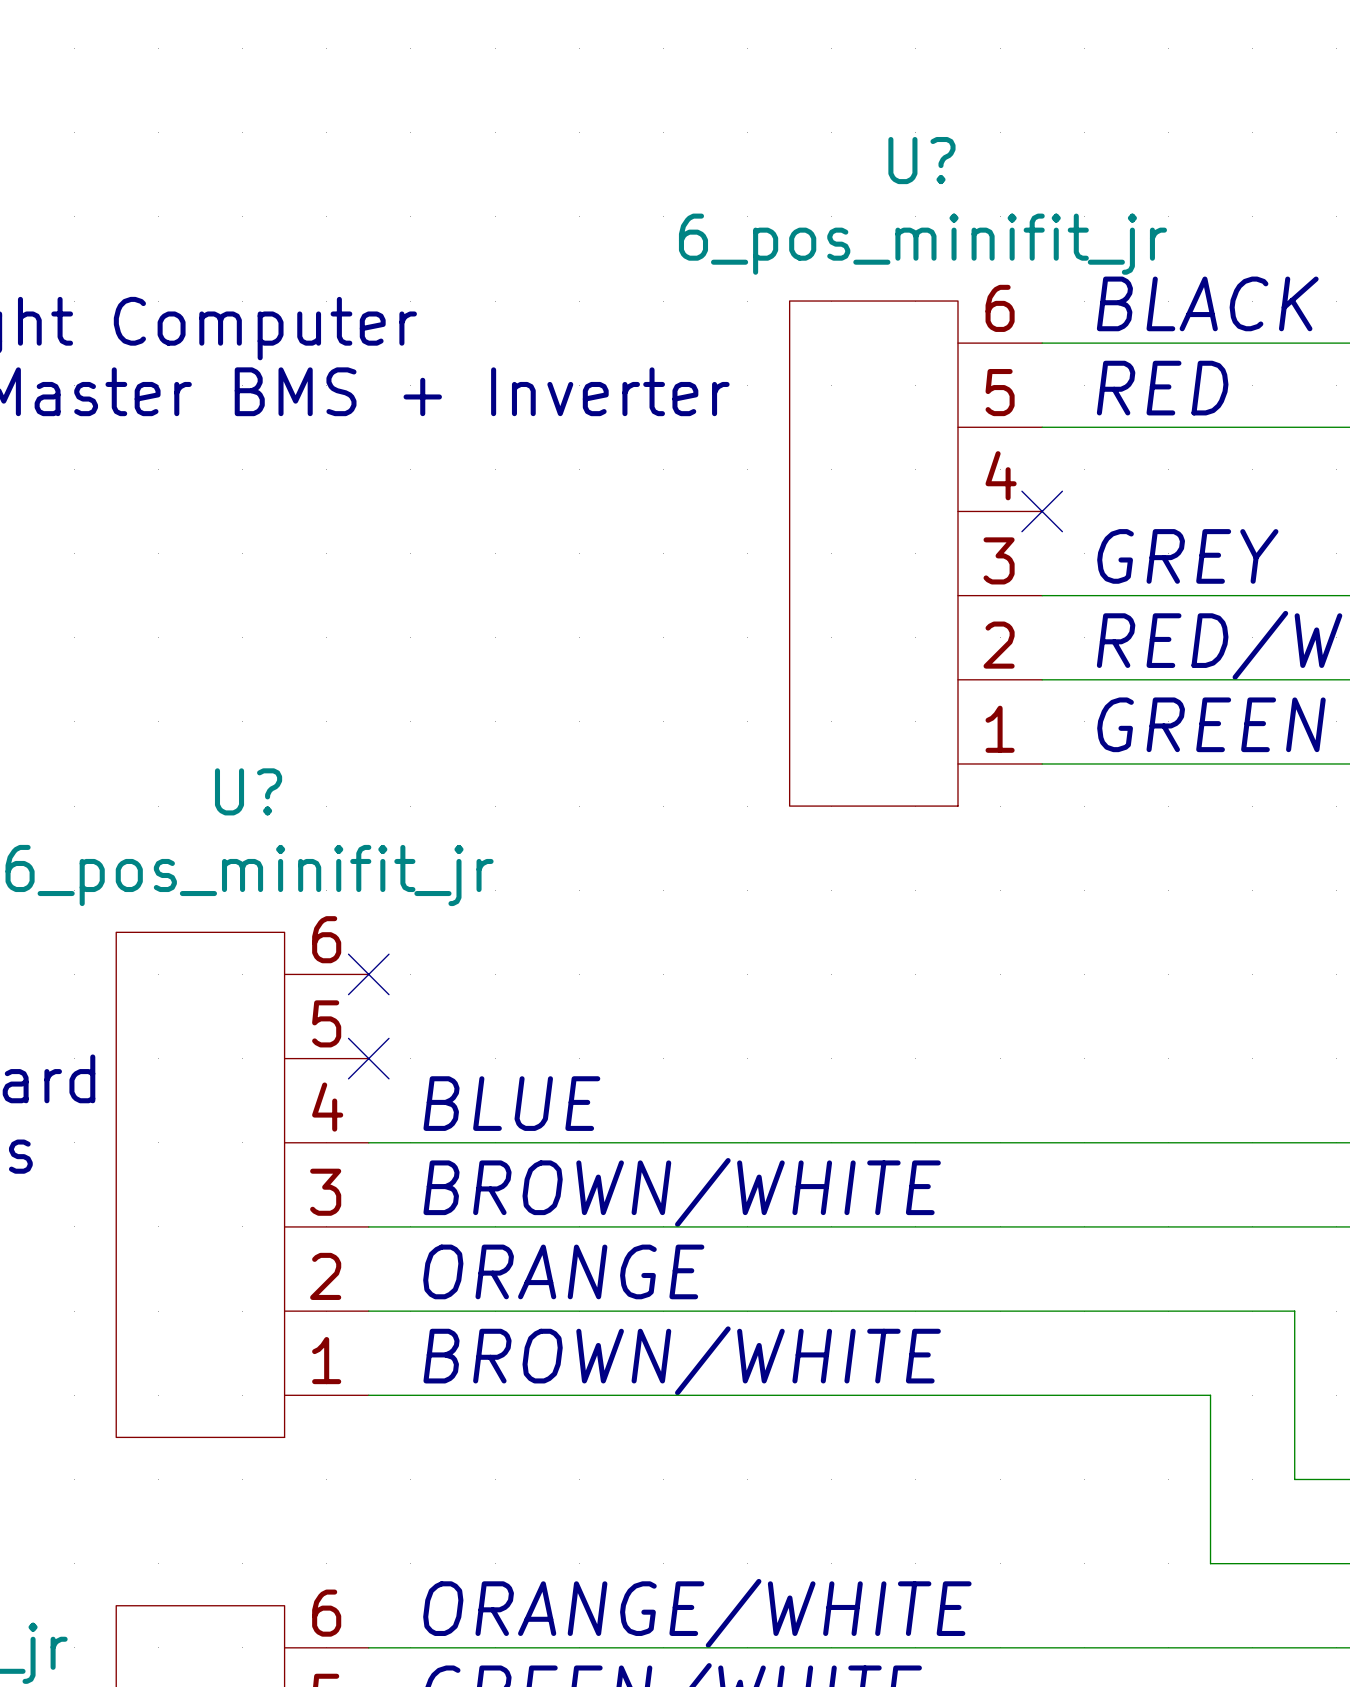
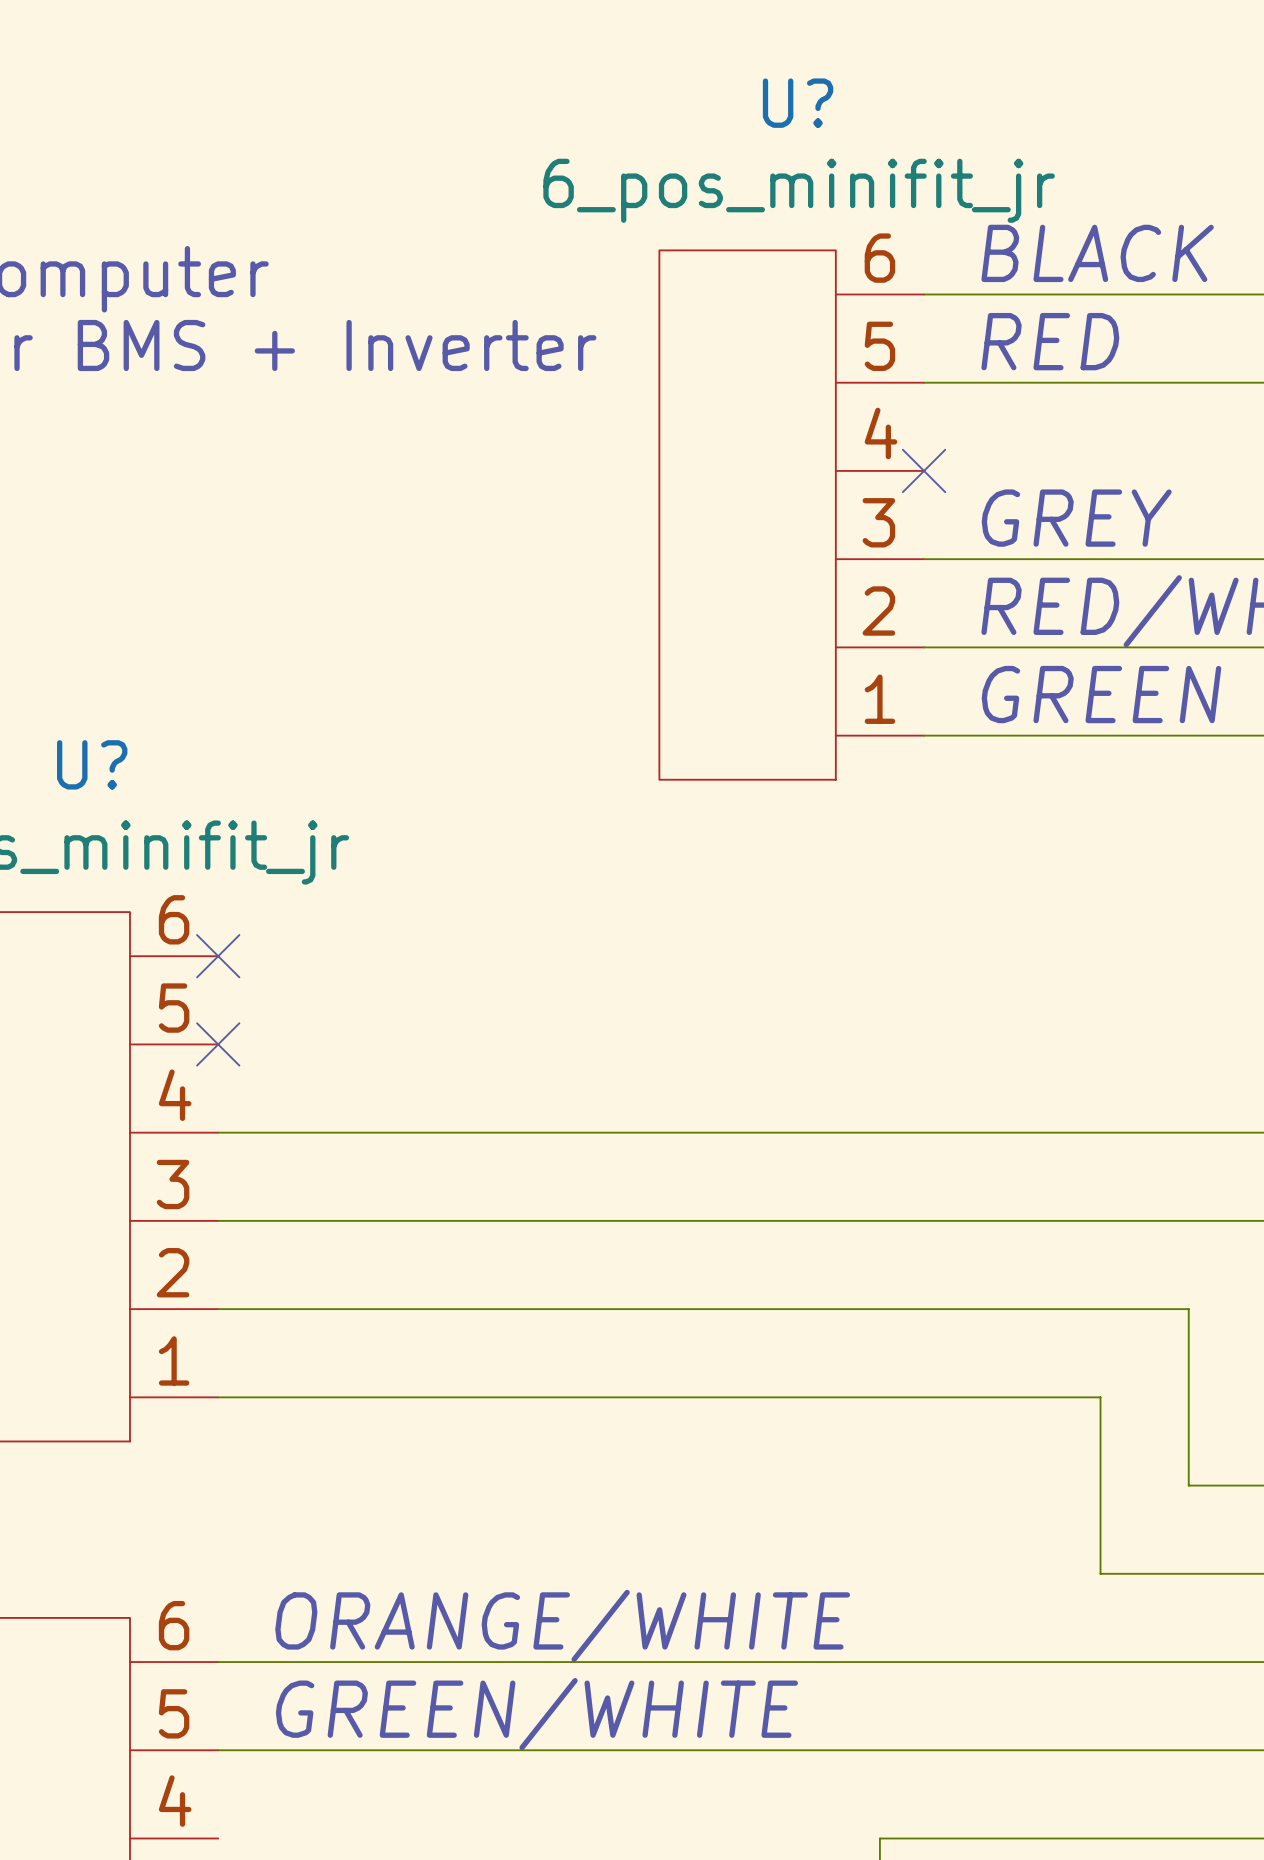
text: BLUE (511, 1103) -> none
text: BROWN/WHITE (682, 1192) -> none
text: ORANGE (563, 1271) -> none
text: BROWN/WHITE (682, 1360) -> none

